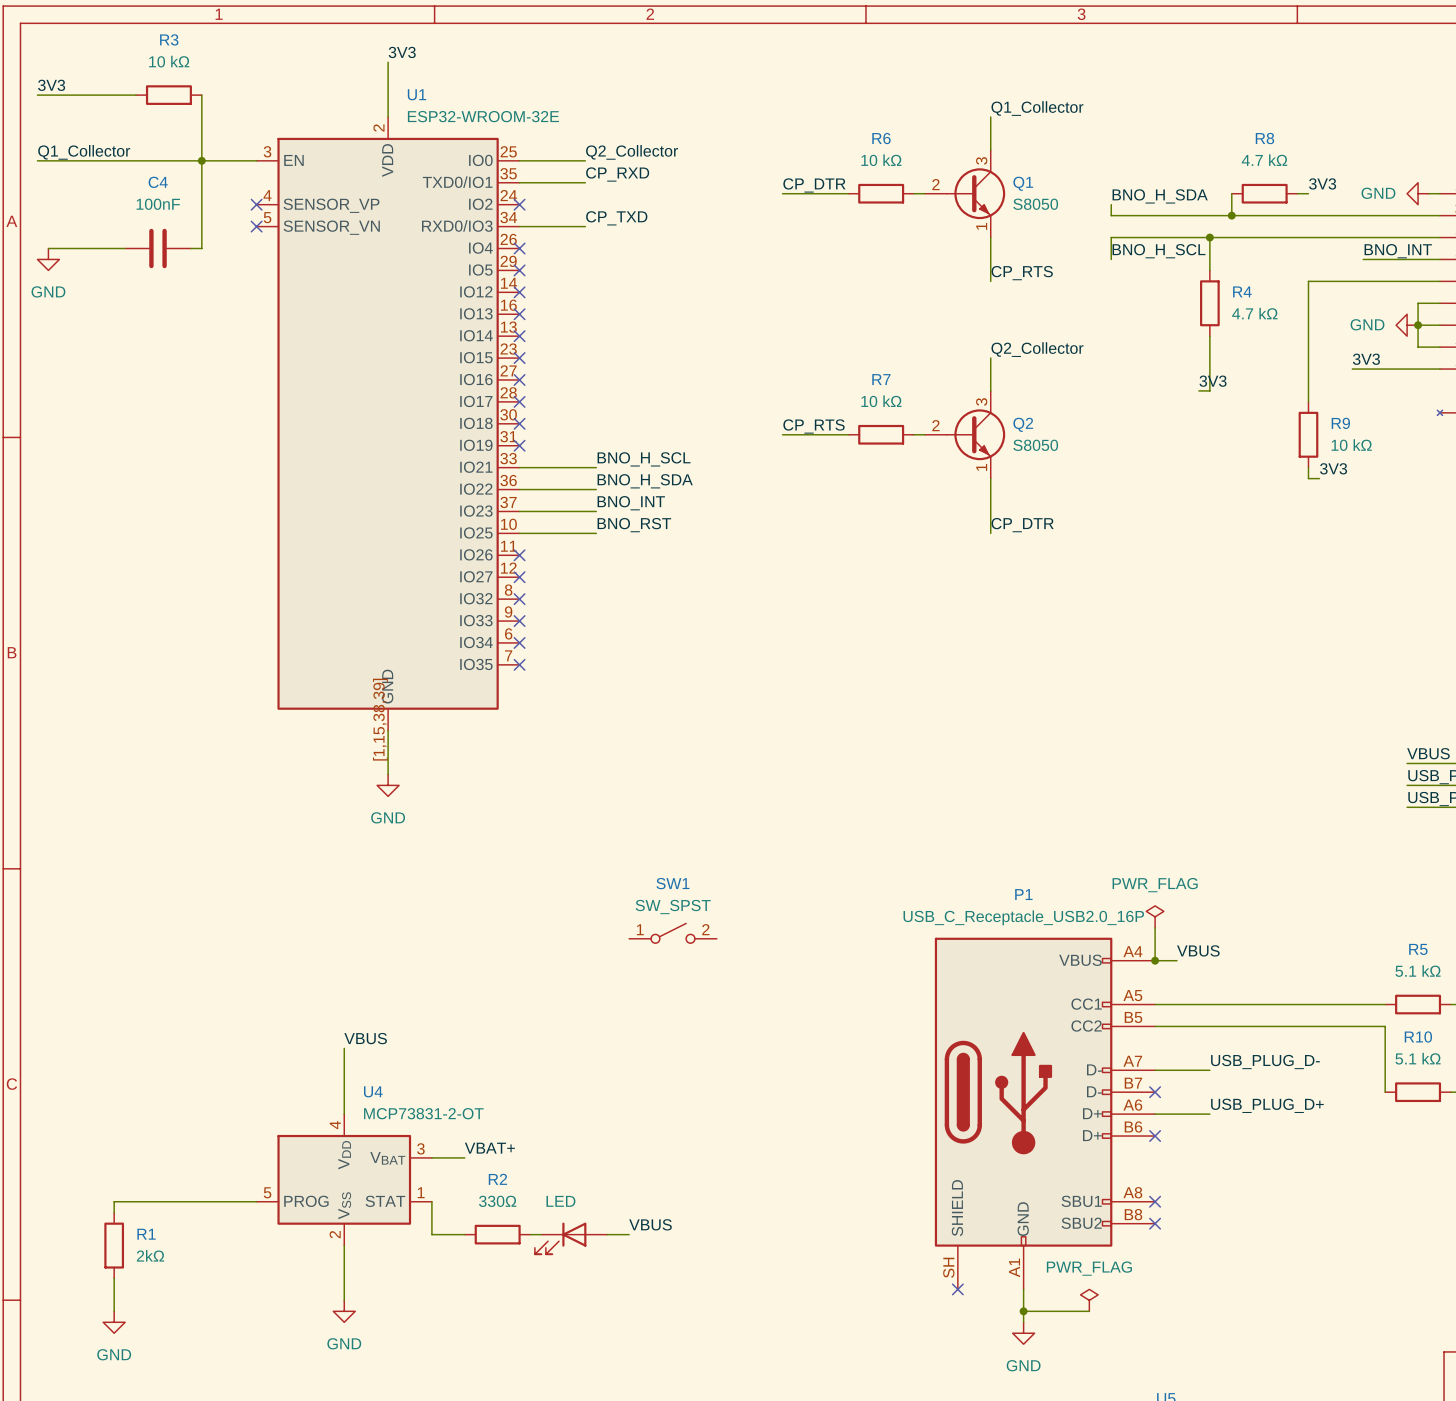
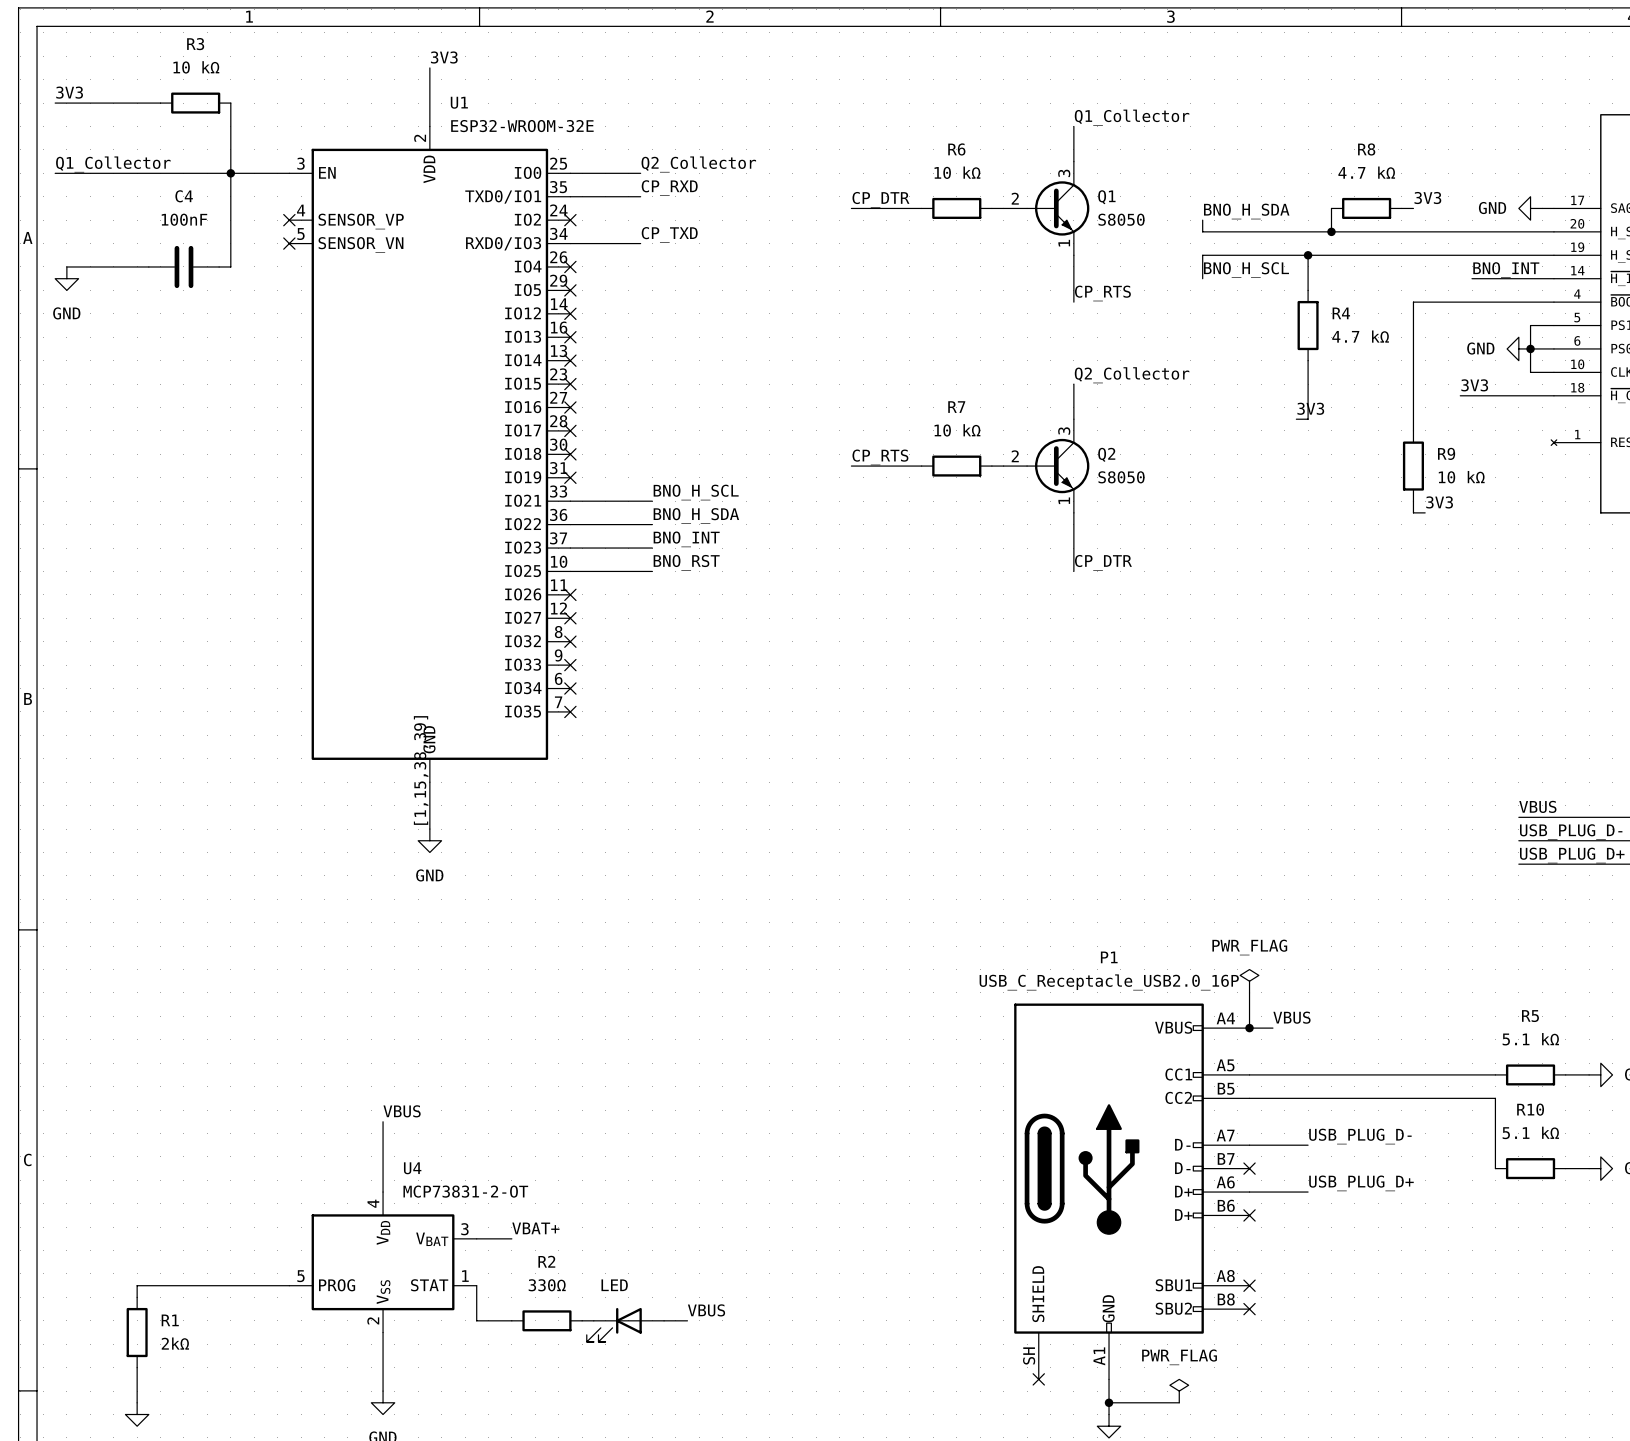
SW1: SW_SPST (672, 933) -> none

